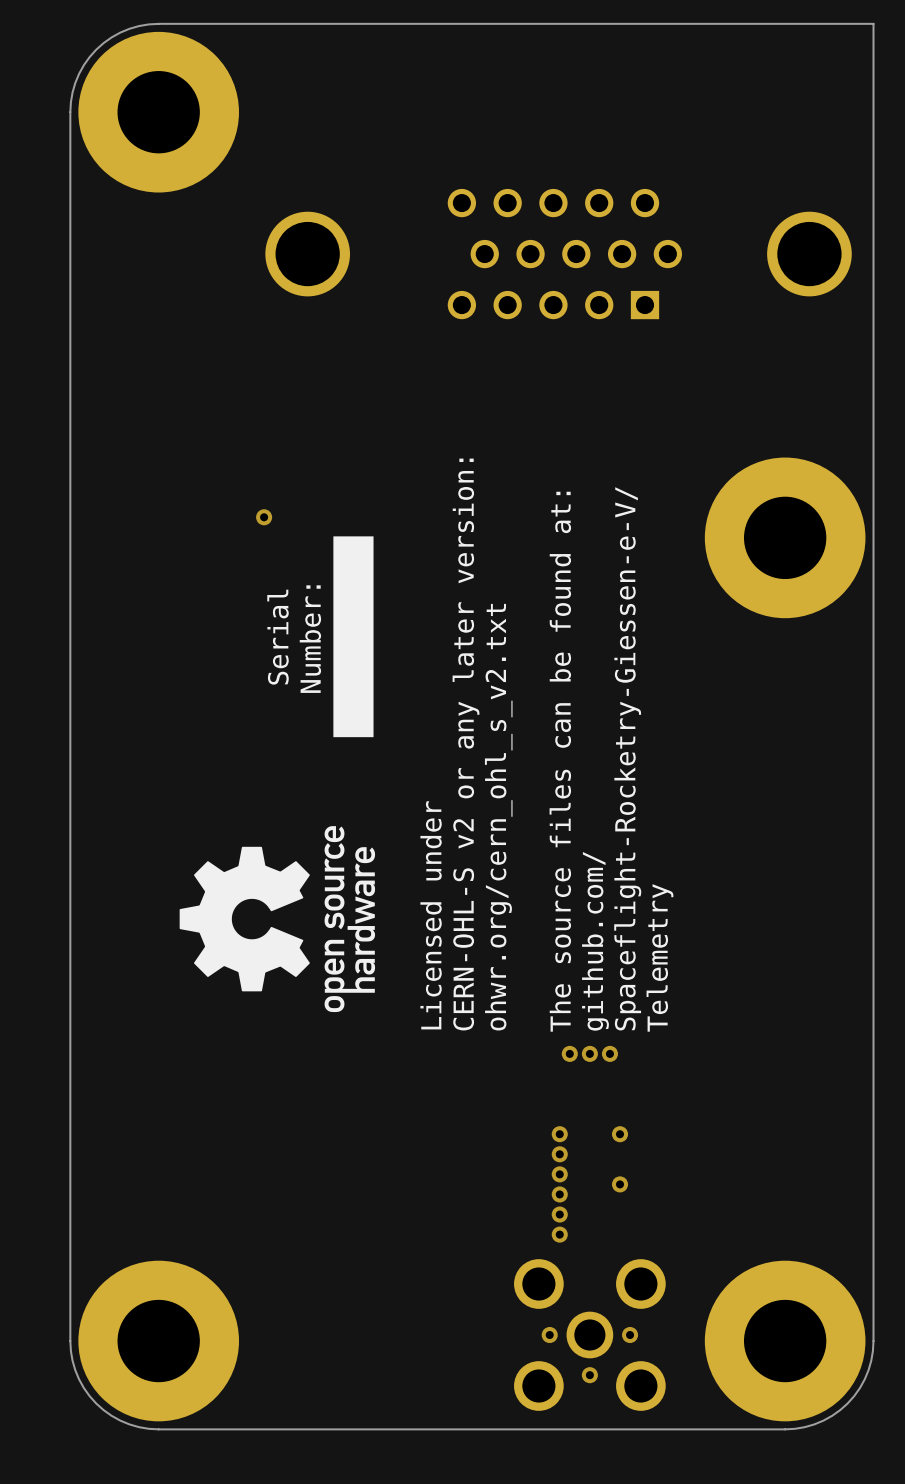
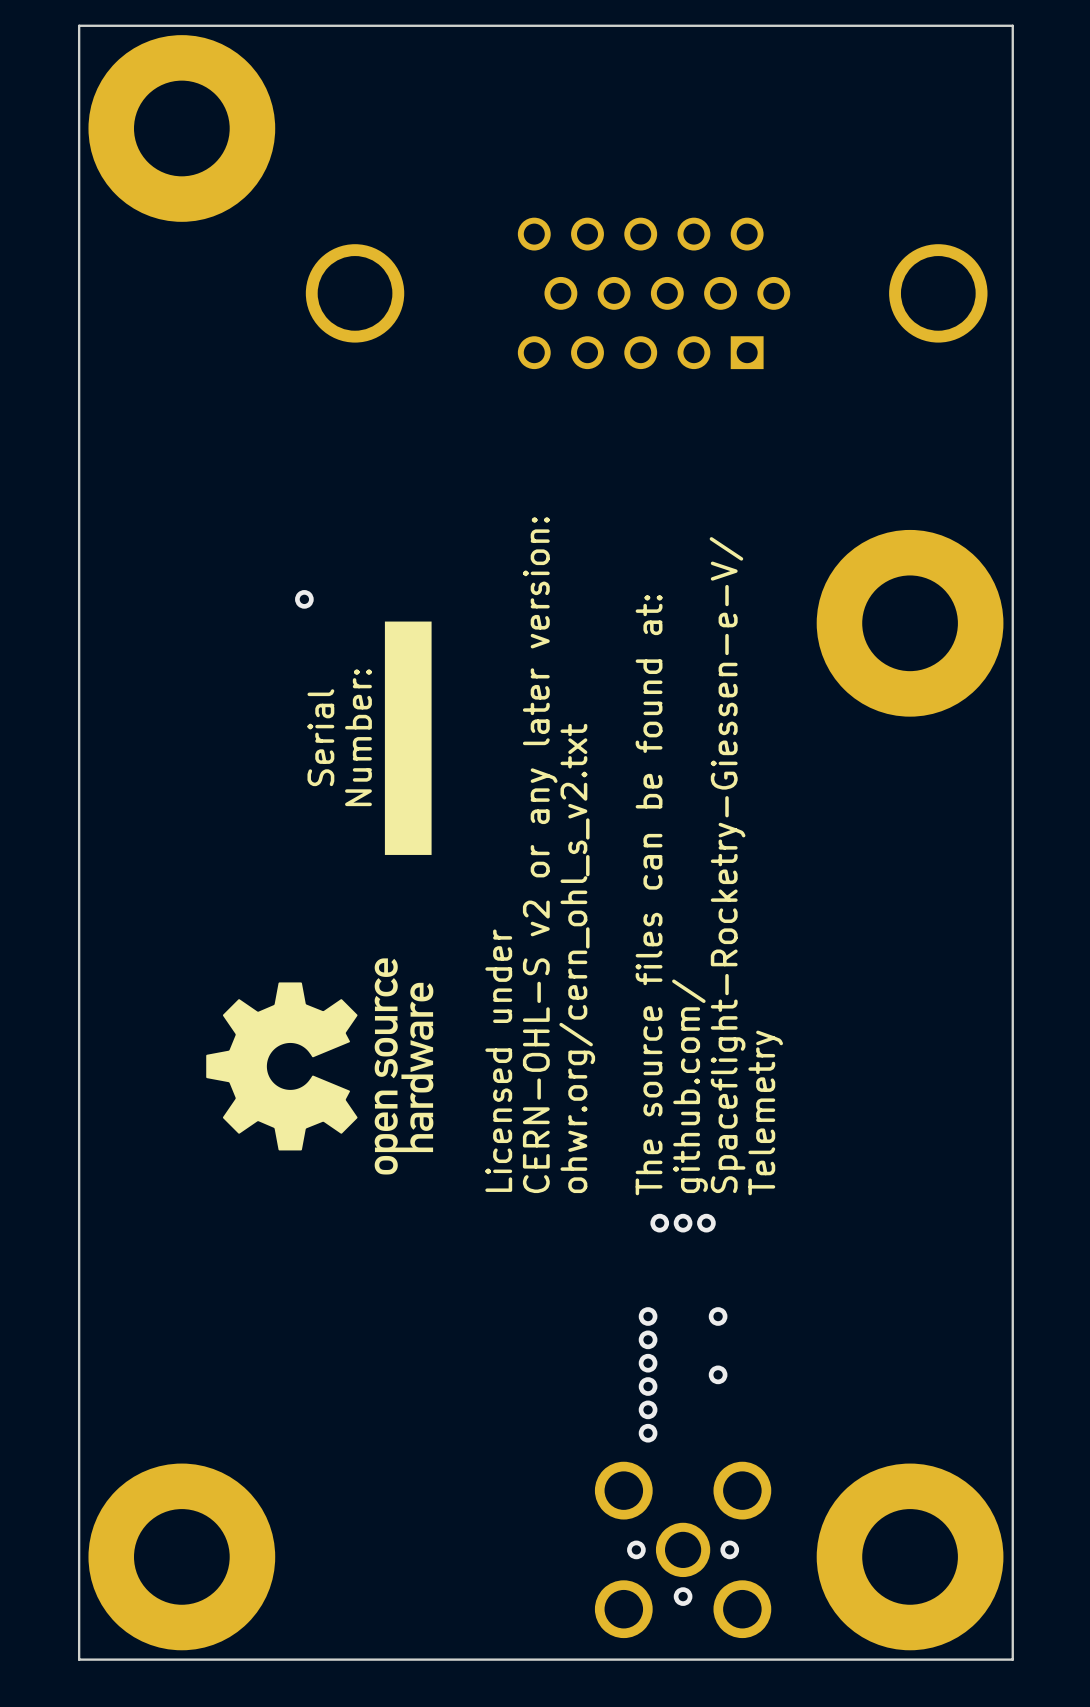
board edge: (158, 23) (139, 26) (120, 32) (96, 49) (79, 73) (72, 92) (70, 112) -> (181, 25) (79, 25) (79, 128)
board edge: (70, 1341) (72, 1360) (79, 1379) (96, 1403) (120, 1420) (139, 1427) (158, 1429) -> (79, 1556) (79, 1659) (181, 1659)
board edge: (873, 1341) (871, 1360) (864, 1379) (847, 1403) (823, 1420) (804, 1427) (785, 1429) -> (1012, 1556) (1012, 1659) (910, 1659)

